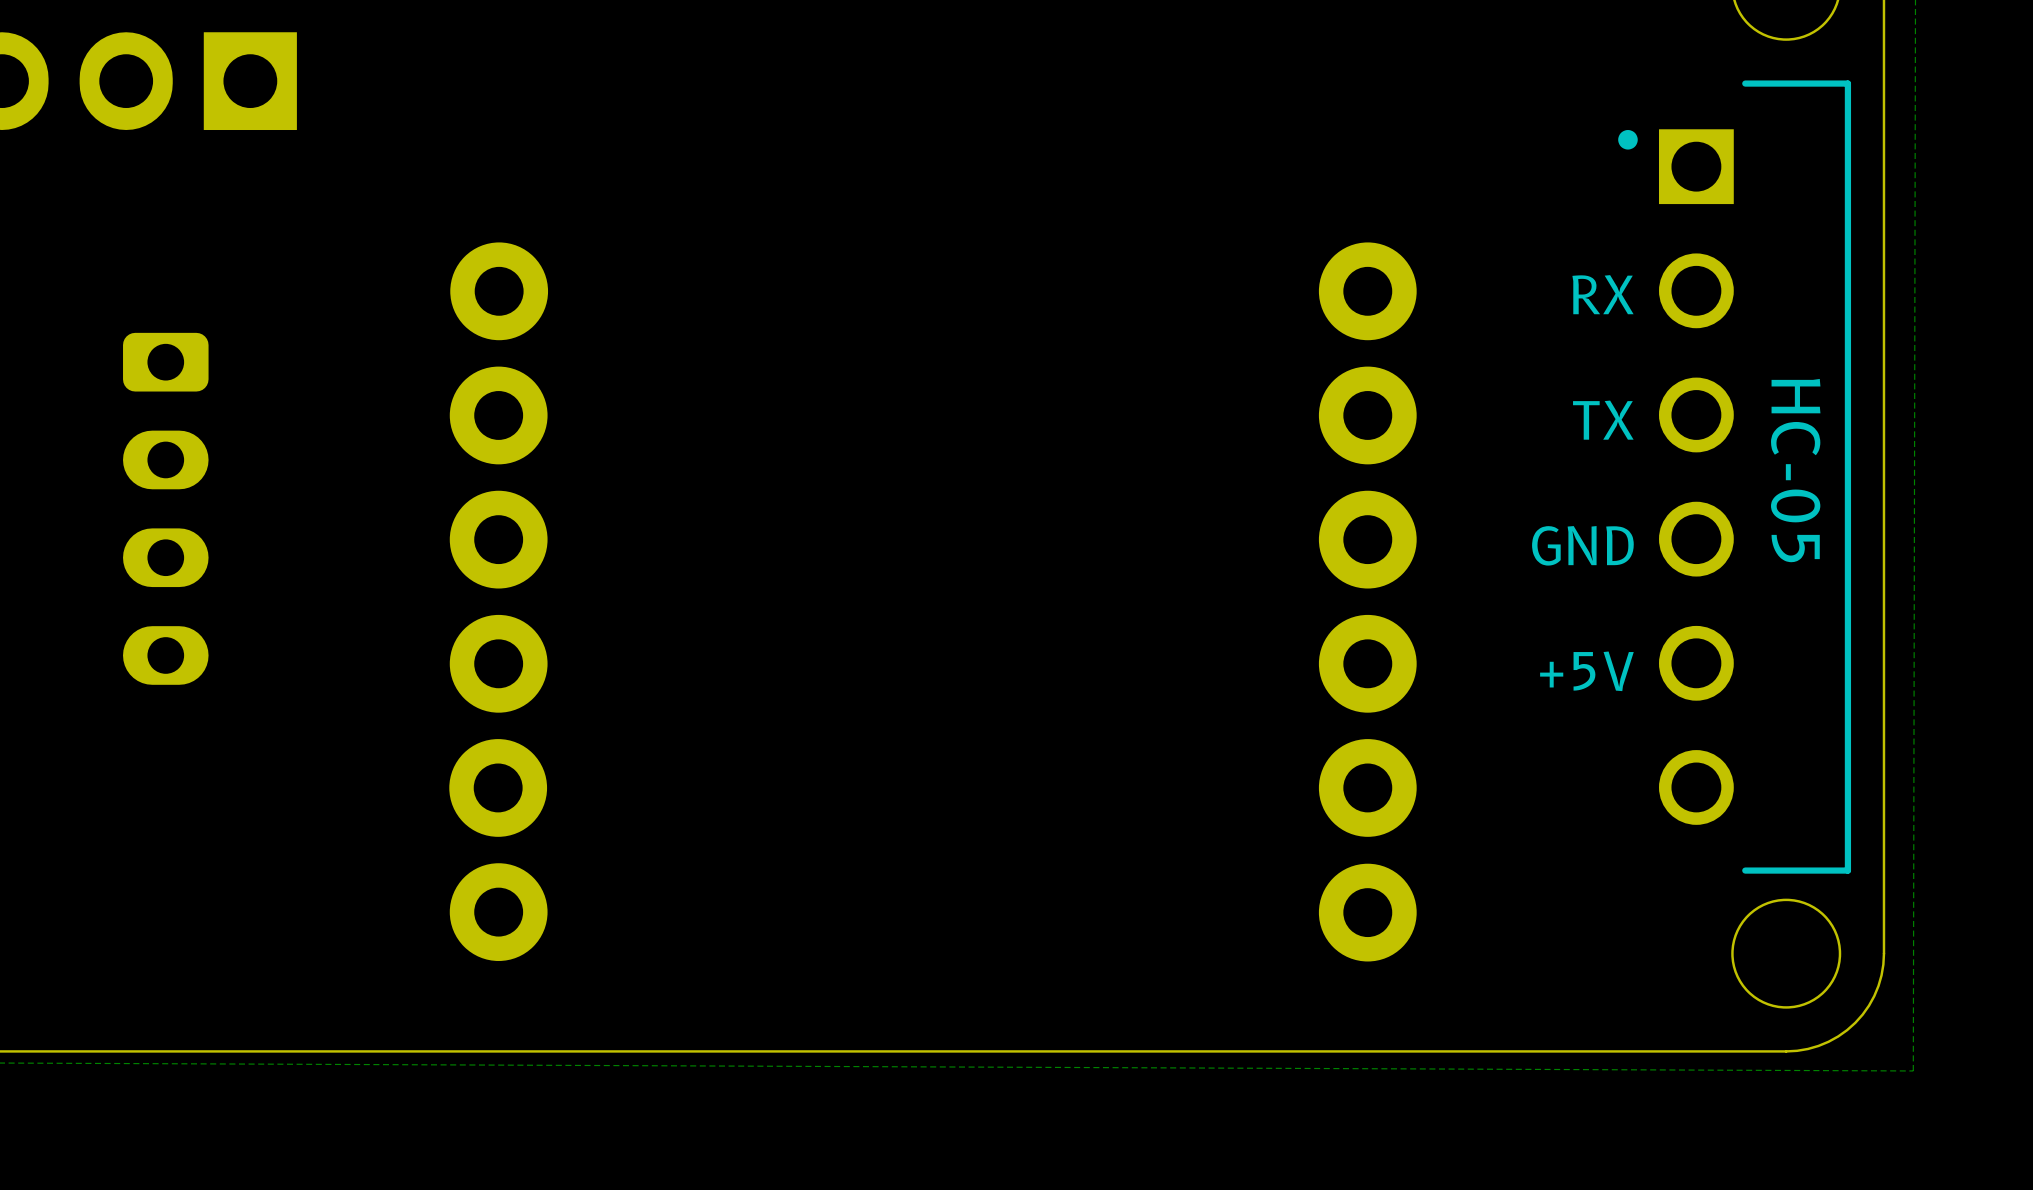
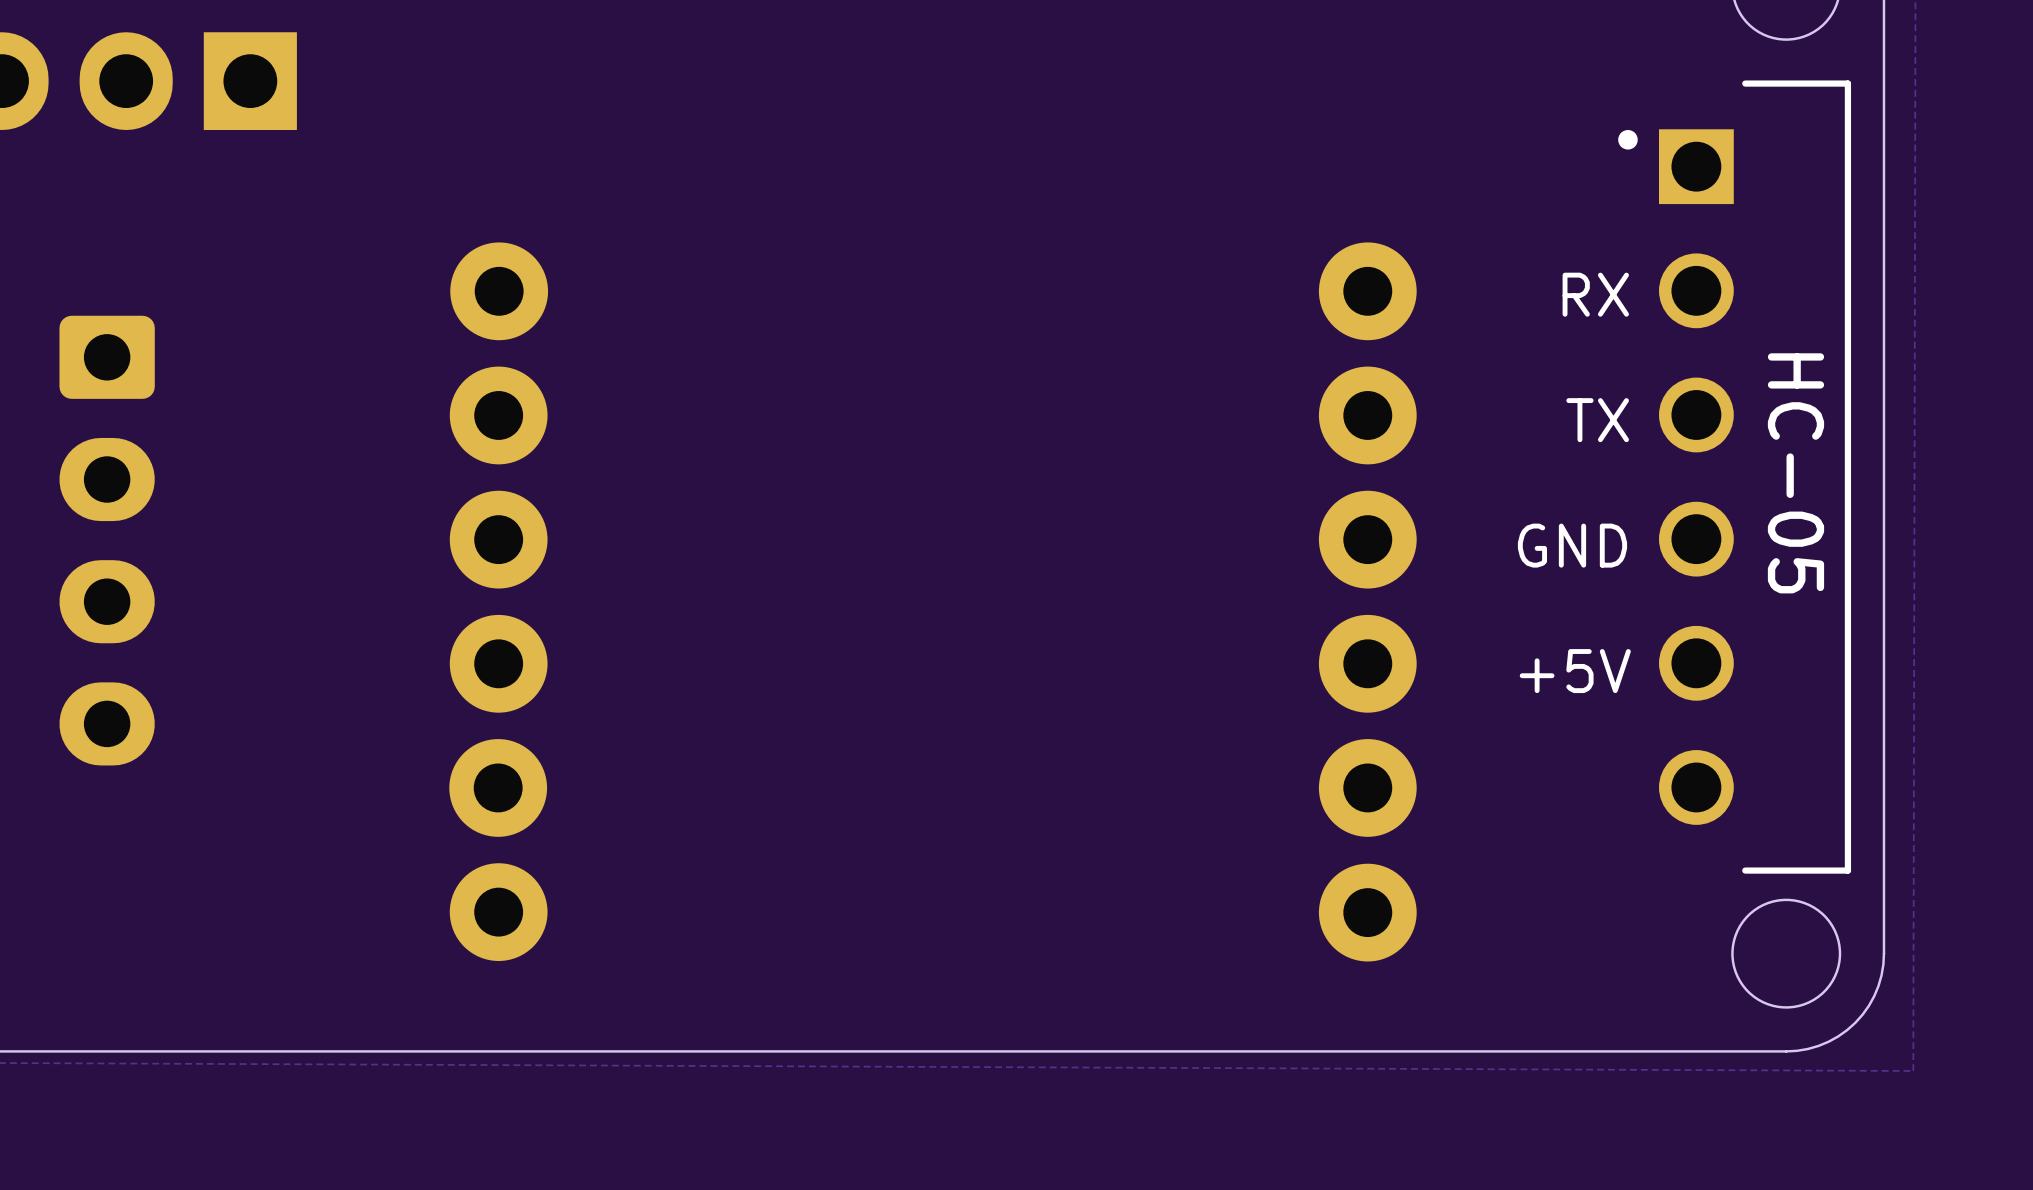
part: (165, 508) -> none
part: none -> (107, 540)

